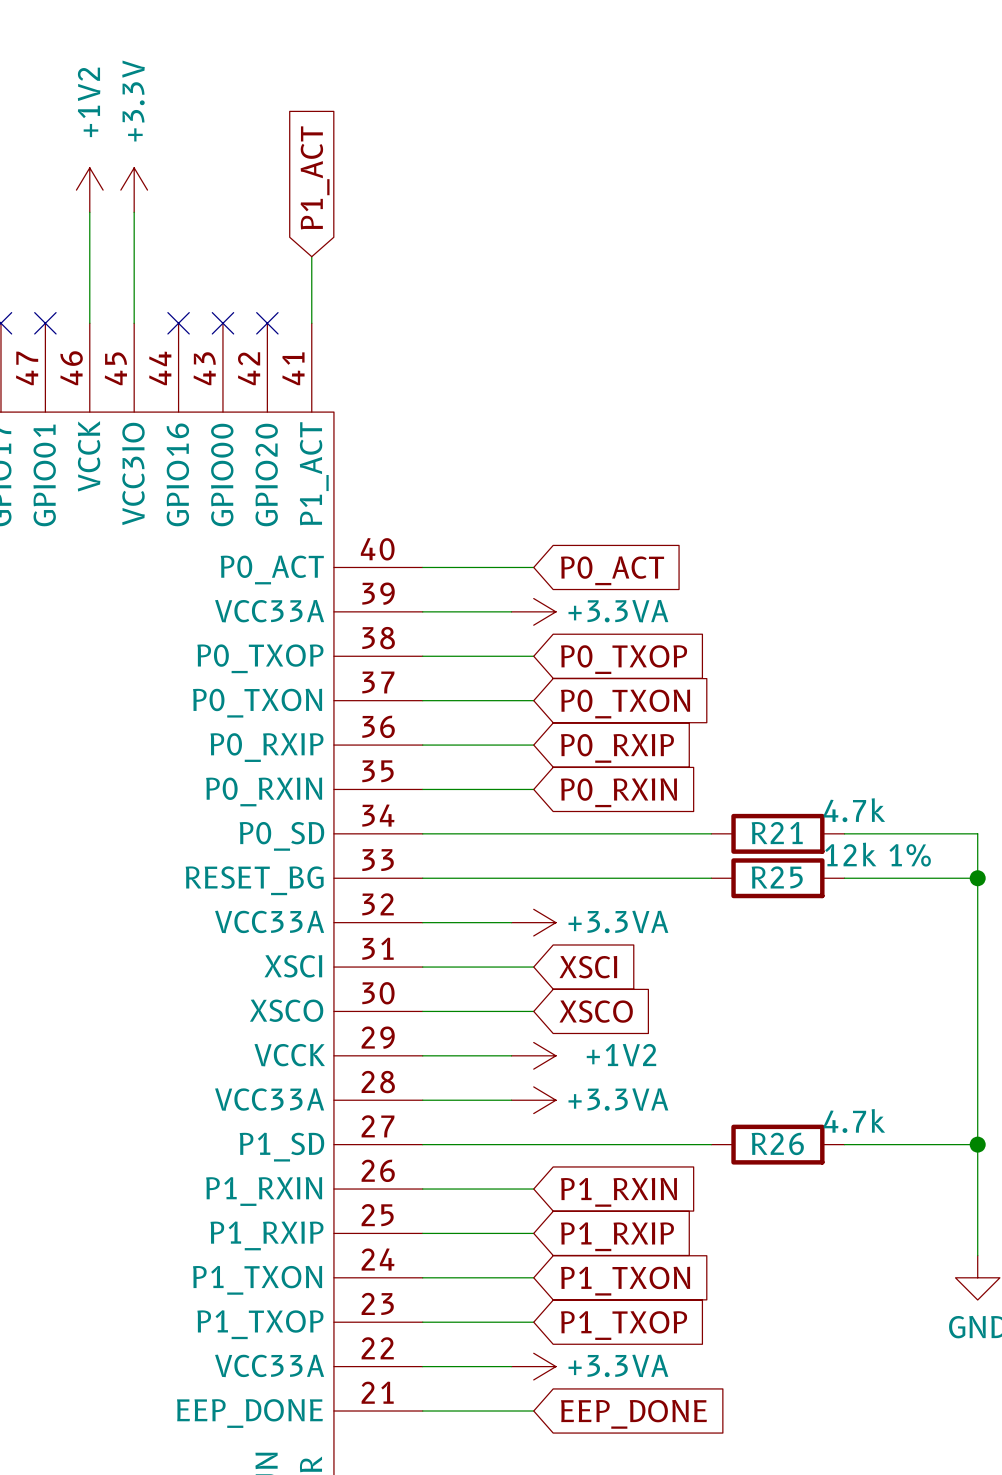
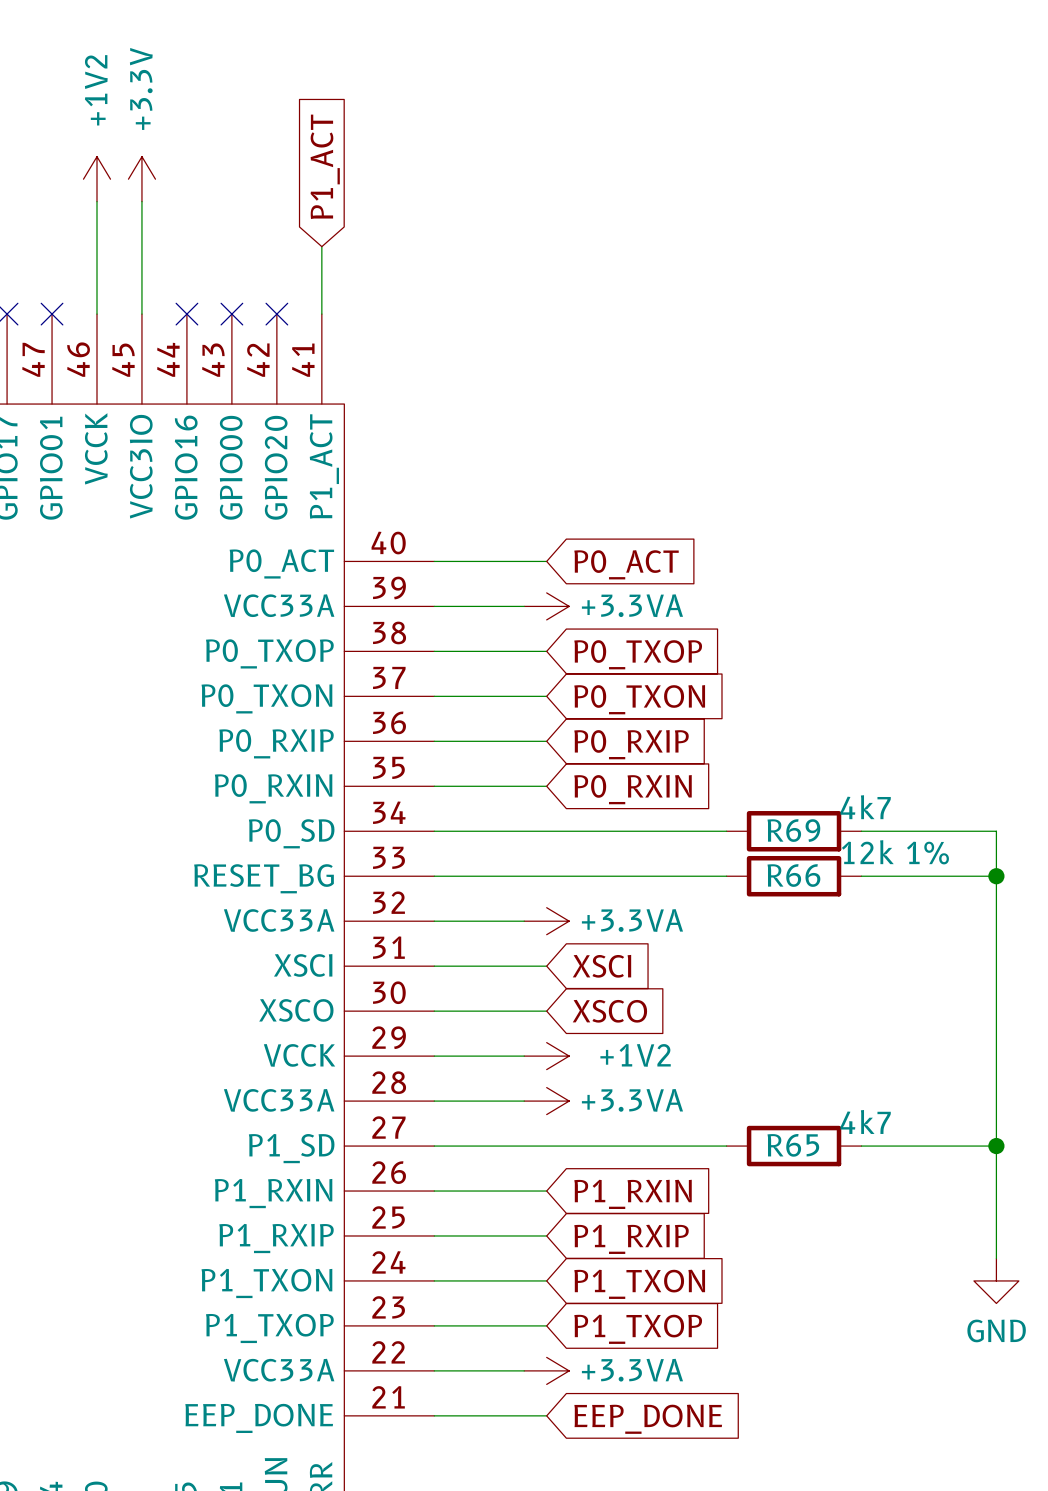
R21 value: 4.7k (854, 810) -> 4k7 (865, 807)
R21 name: R21 (777, 833) -> R69 (793, 830)
R25 name: R25 (777, 877) -> R66 (793, 875)
R26 value: 4.7k (854, 1120) -> 4k7 (865, 1121)
R26 name: R26 (777, 1143) -> R65 (793, 1145)

